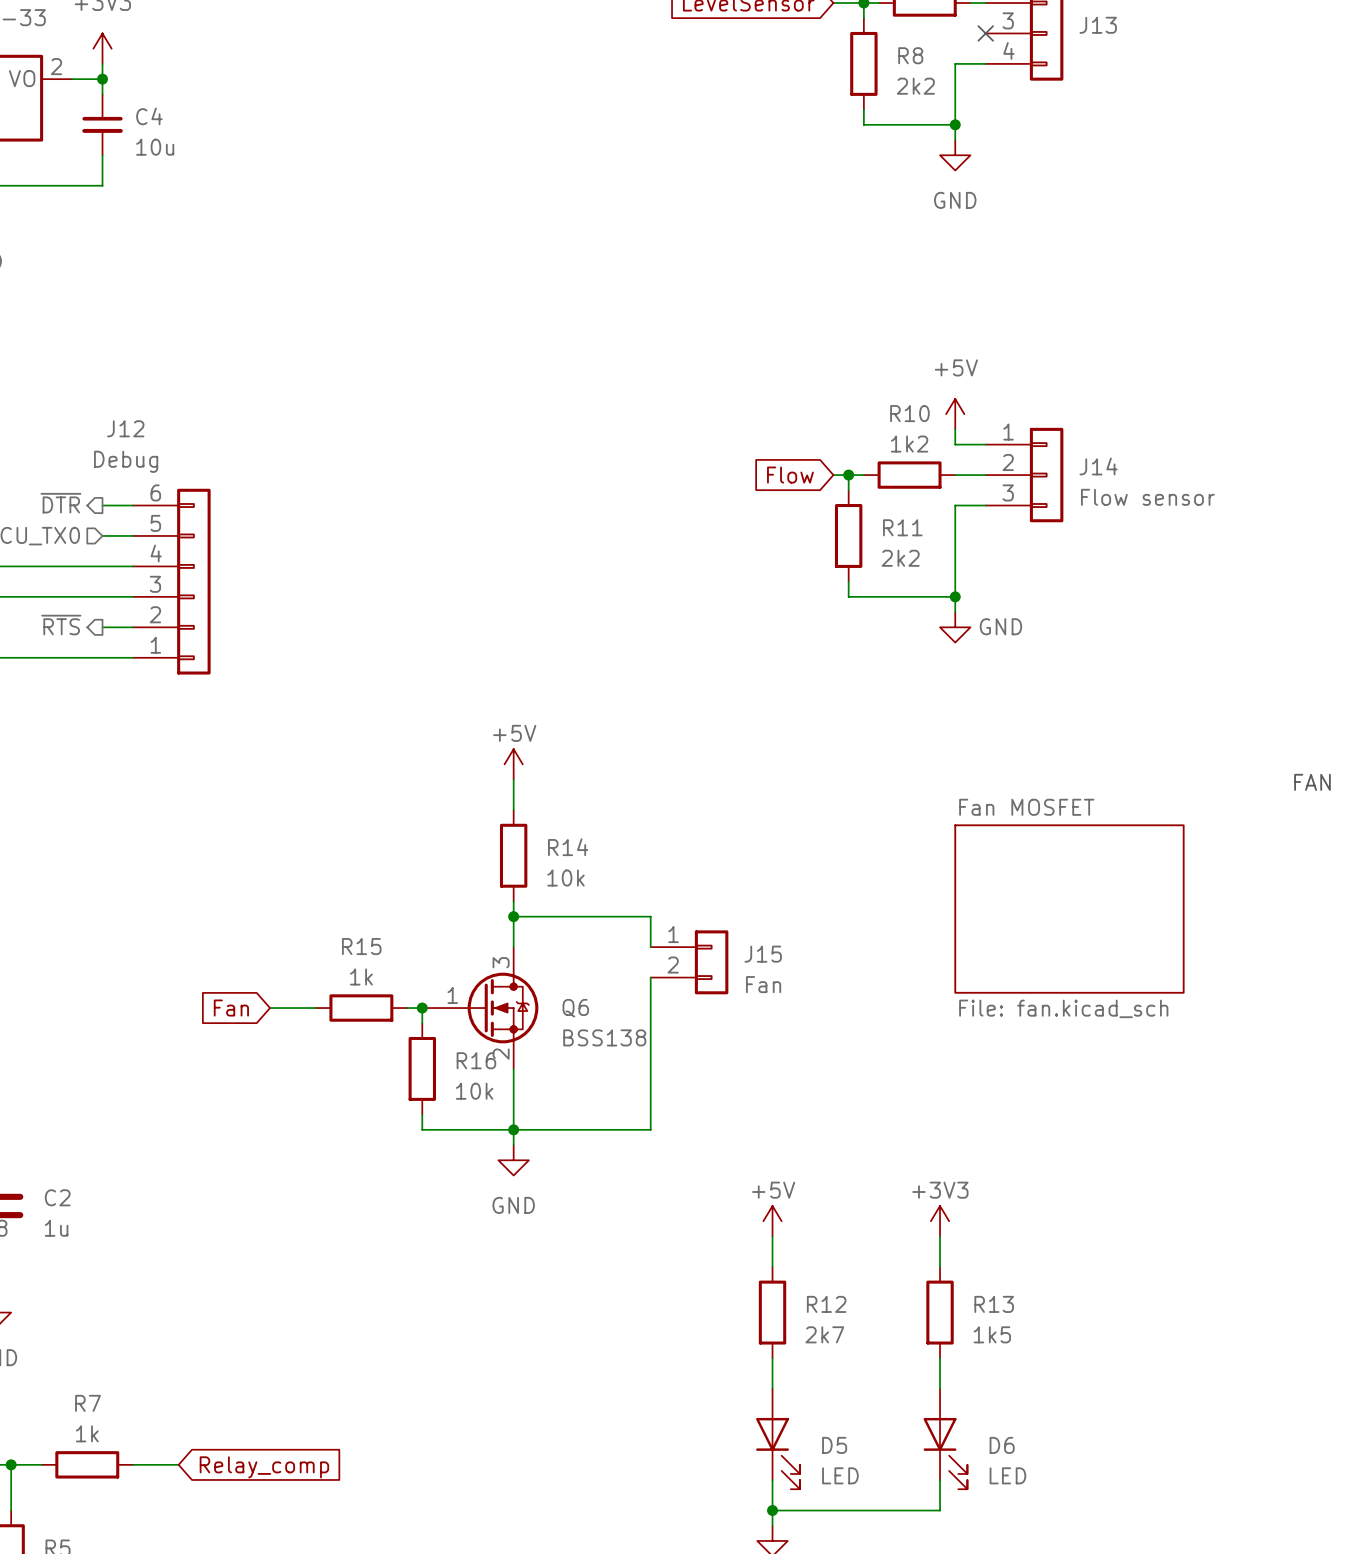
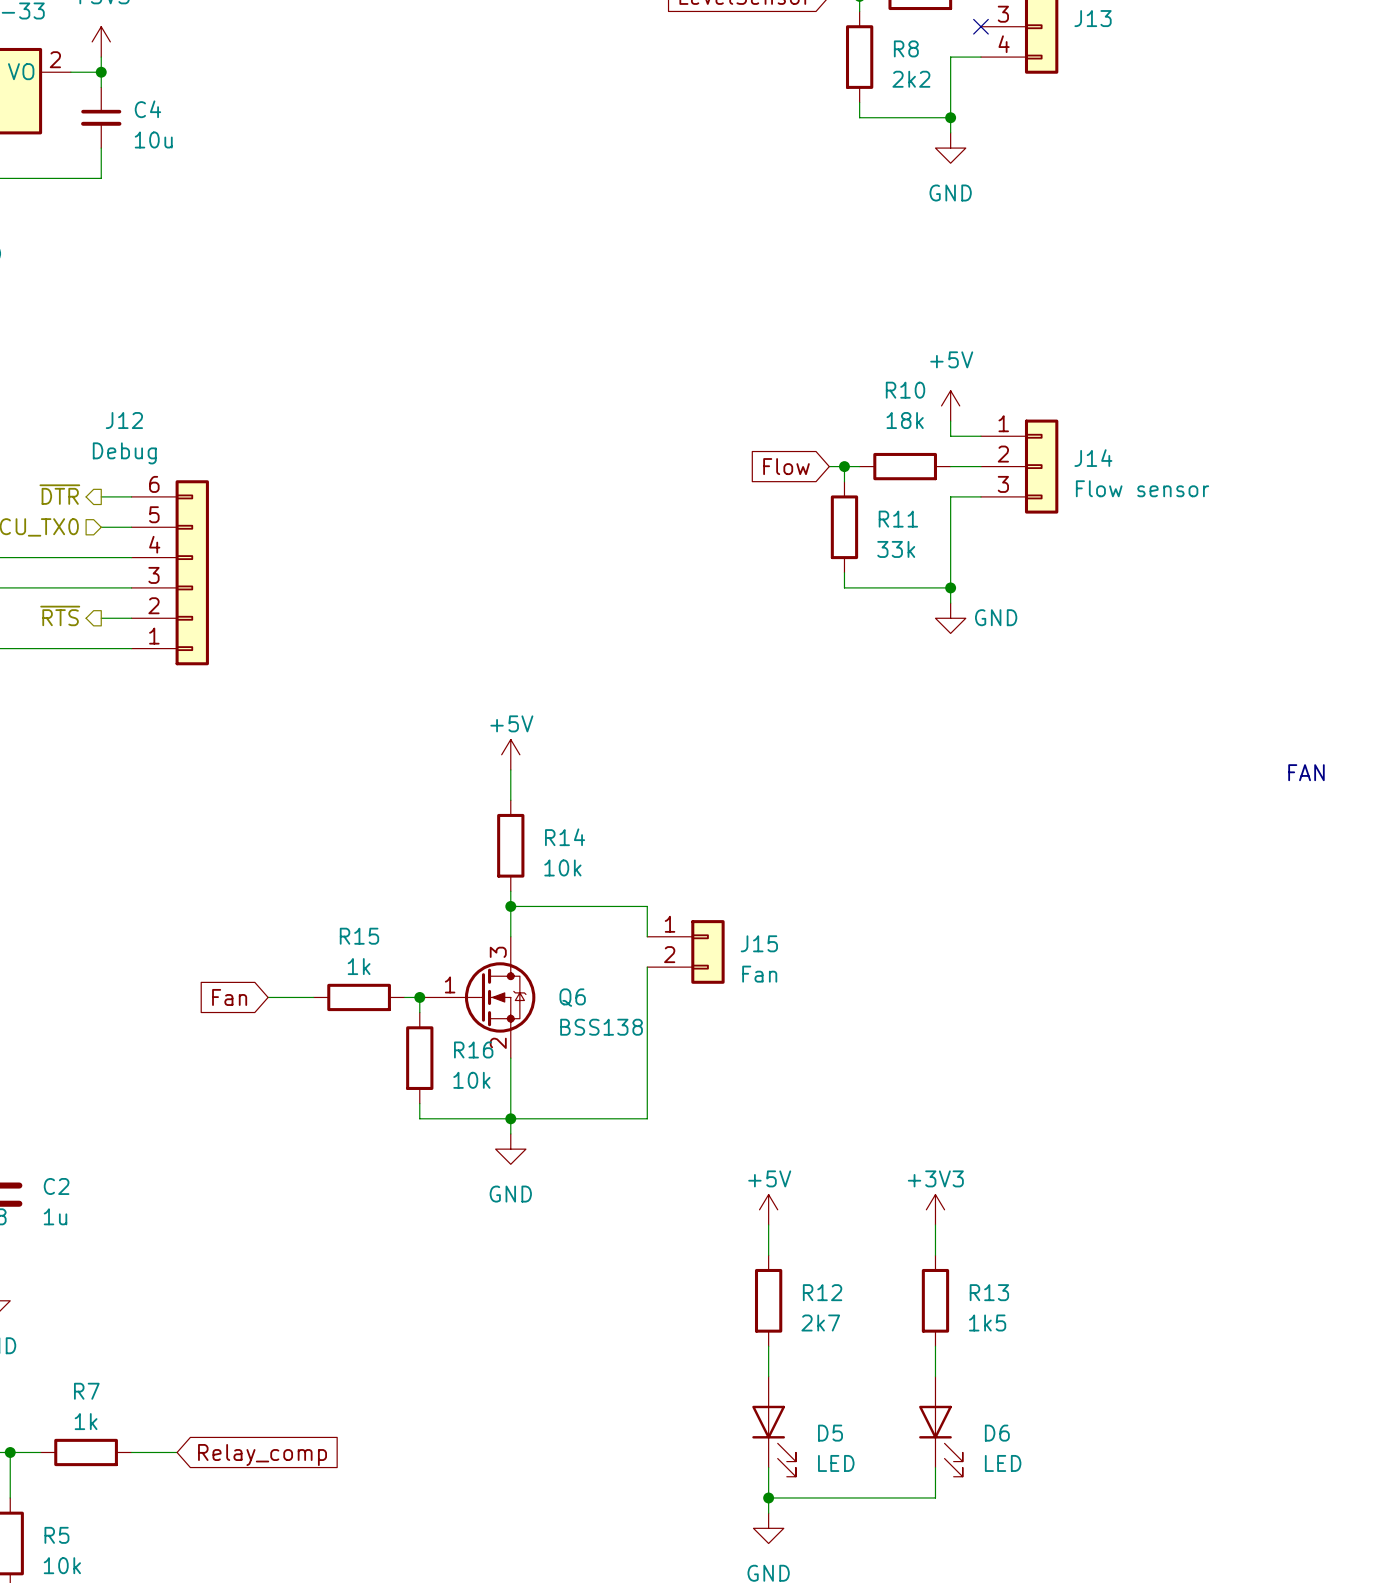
R10 name position: R10 (909, 413) -> R10 (905, 390)
R10 value: 1k2 (909, 444) -> 18k (905, 420)
R11 value: 2k2 (900, 558) -> 33k (896, 549)
sheet Fan MOSFET: File: fan.kicad_sch (1069, 909) -> none

